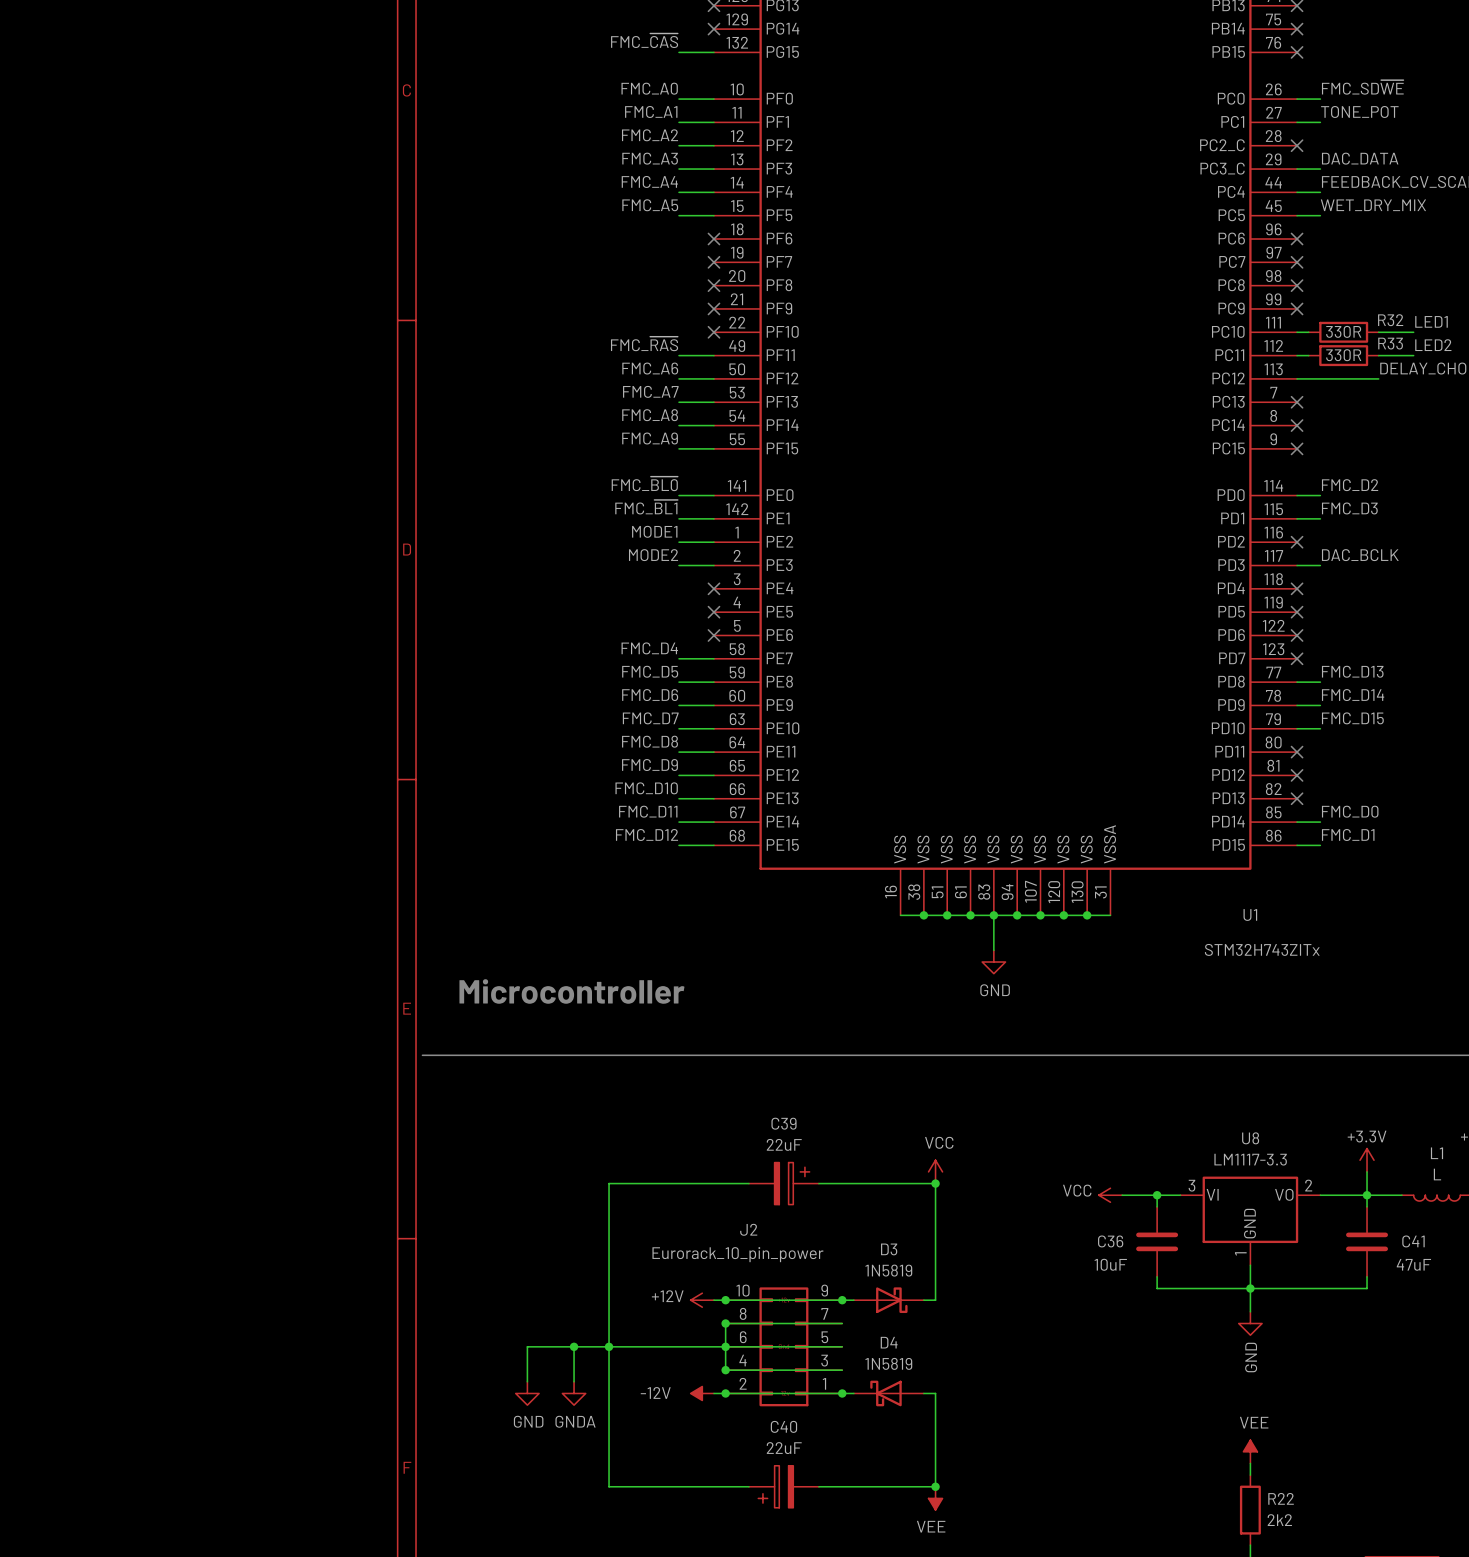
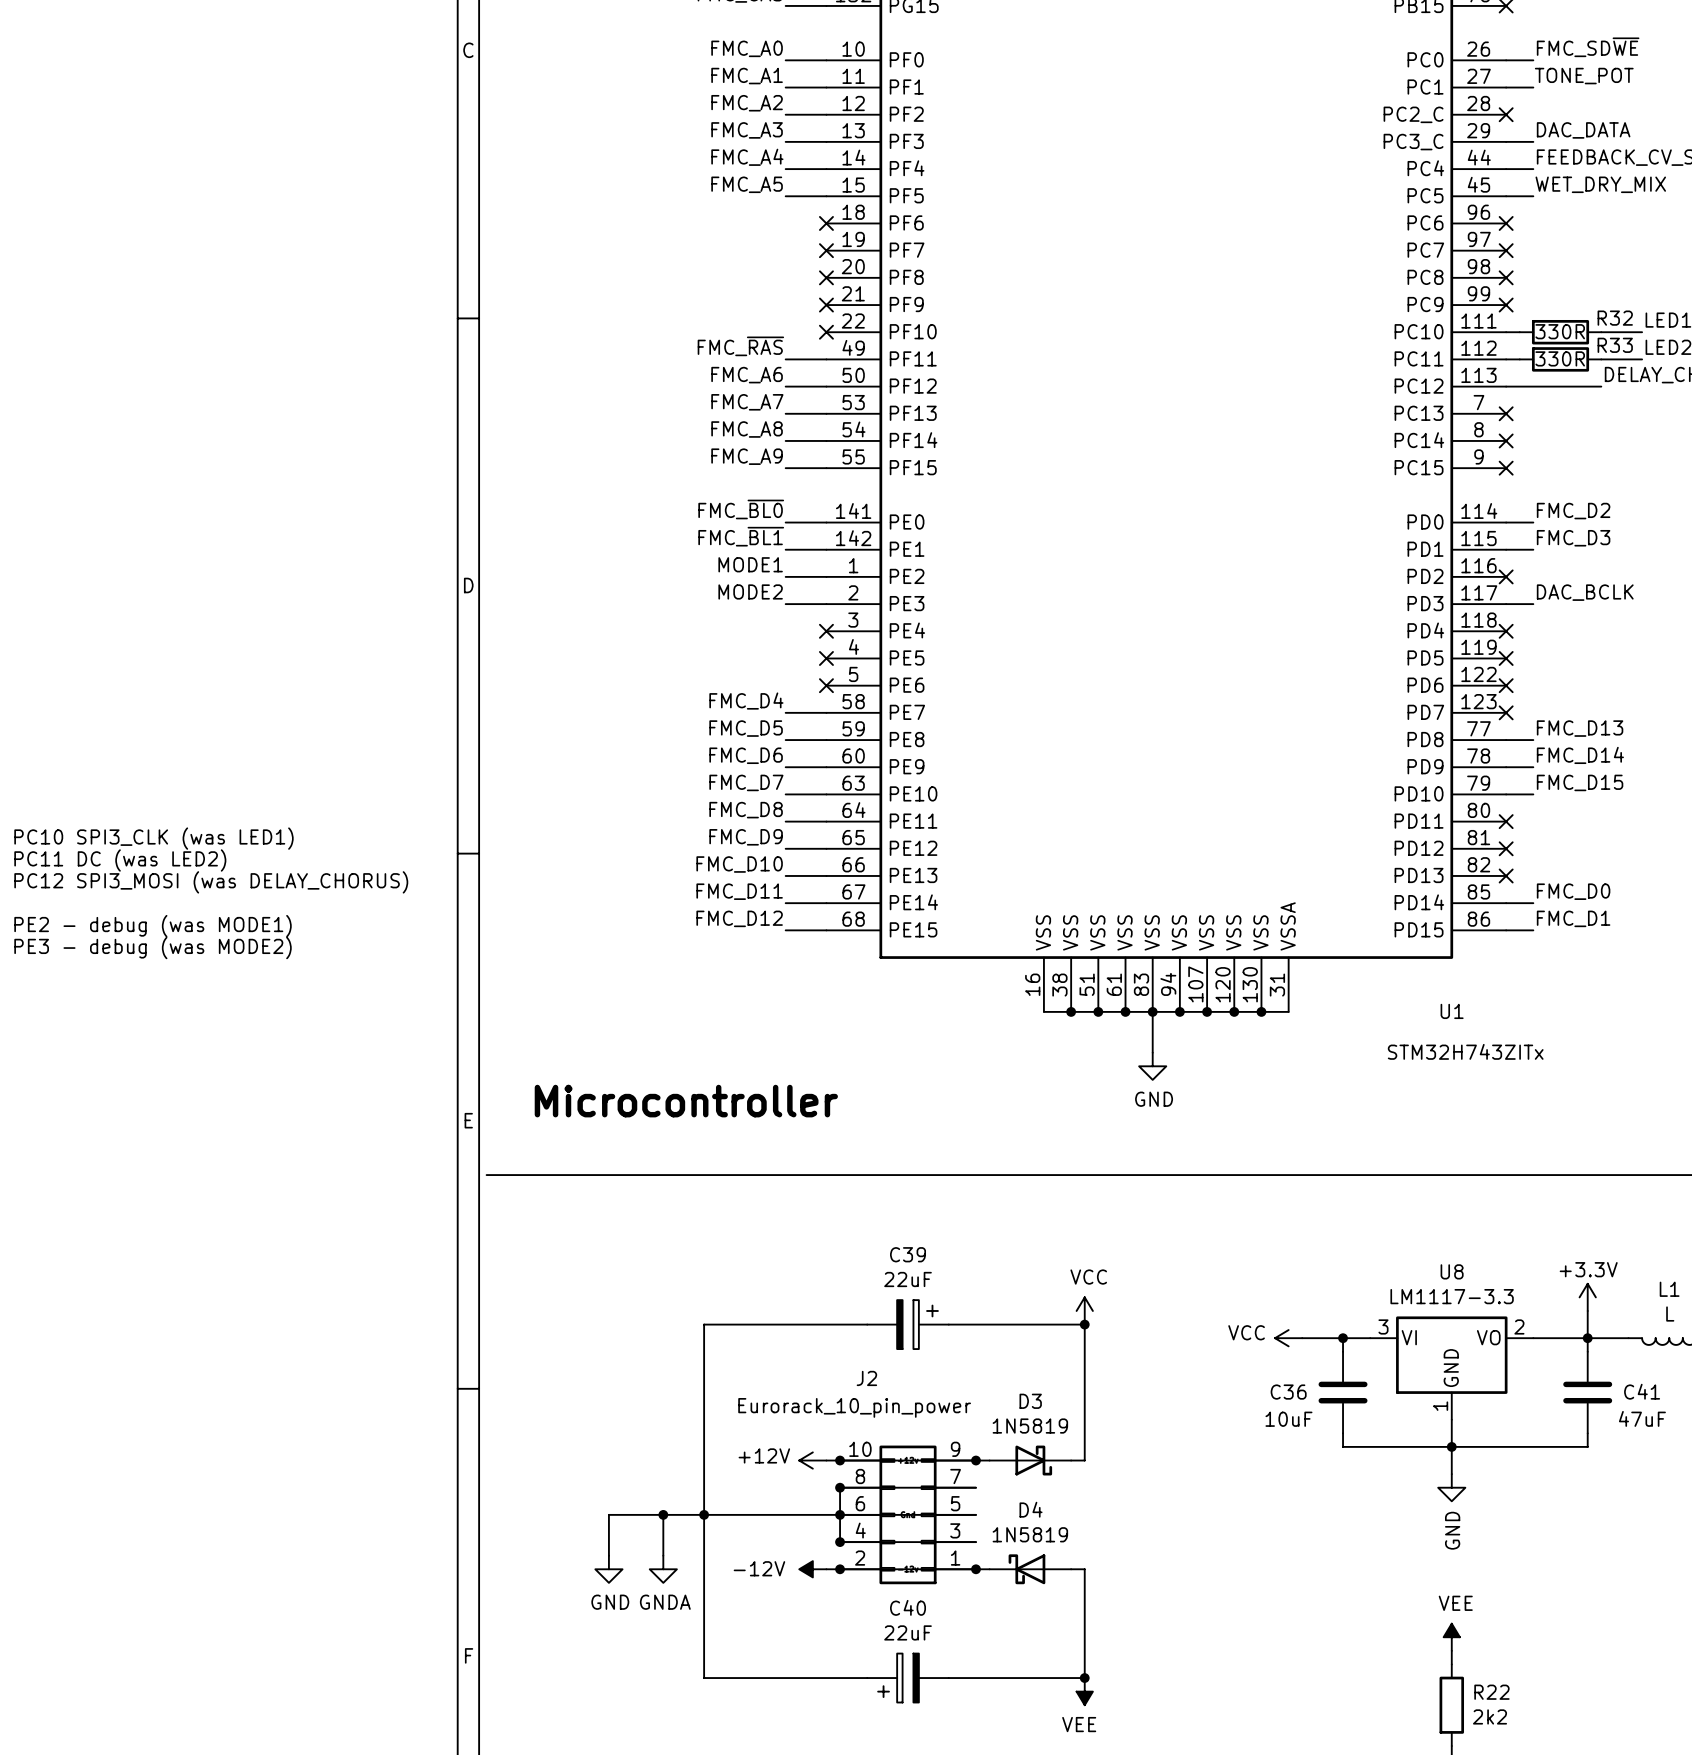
text: none -> PC10 SPI3_CLK (was LED1) (153, 838)
text: none -> PC11 DC (was LED2) (120, 860)
text: none -> PC12 SPI3_MOSI (was DELAY_CHORUS) (211, 882)
text: none -> PE2 - debug (was MODE1) (153, 926)
text: none -> PE3 - debug (was MODE2) (153, 948)

